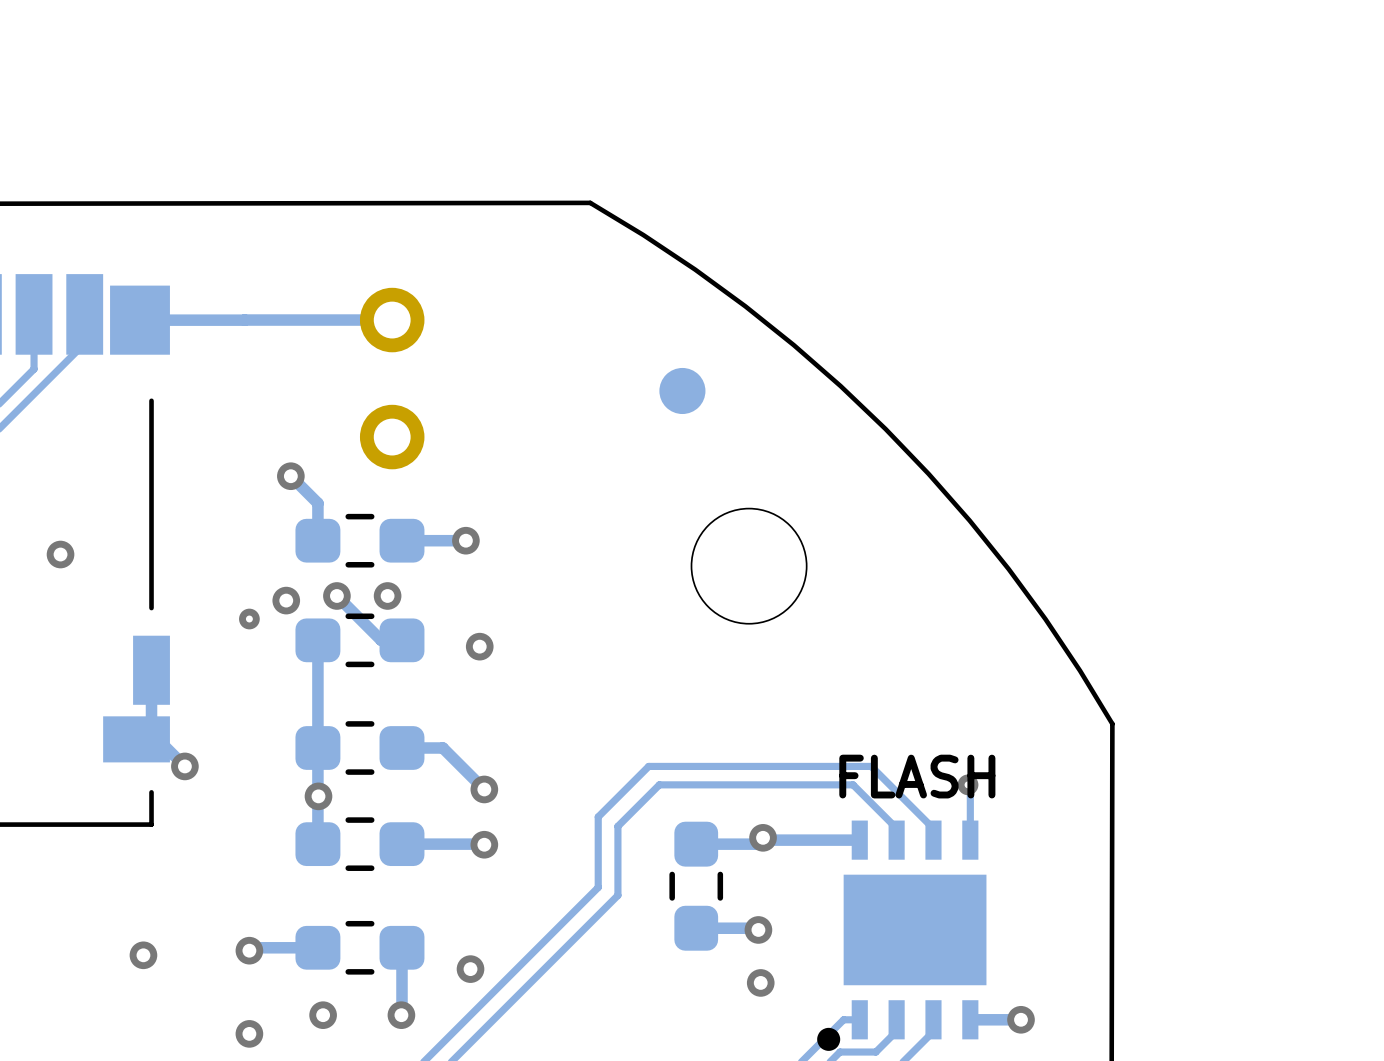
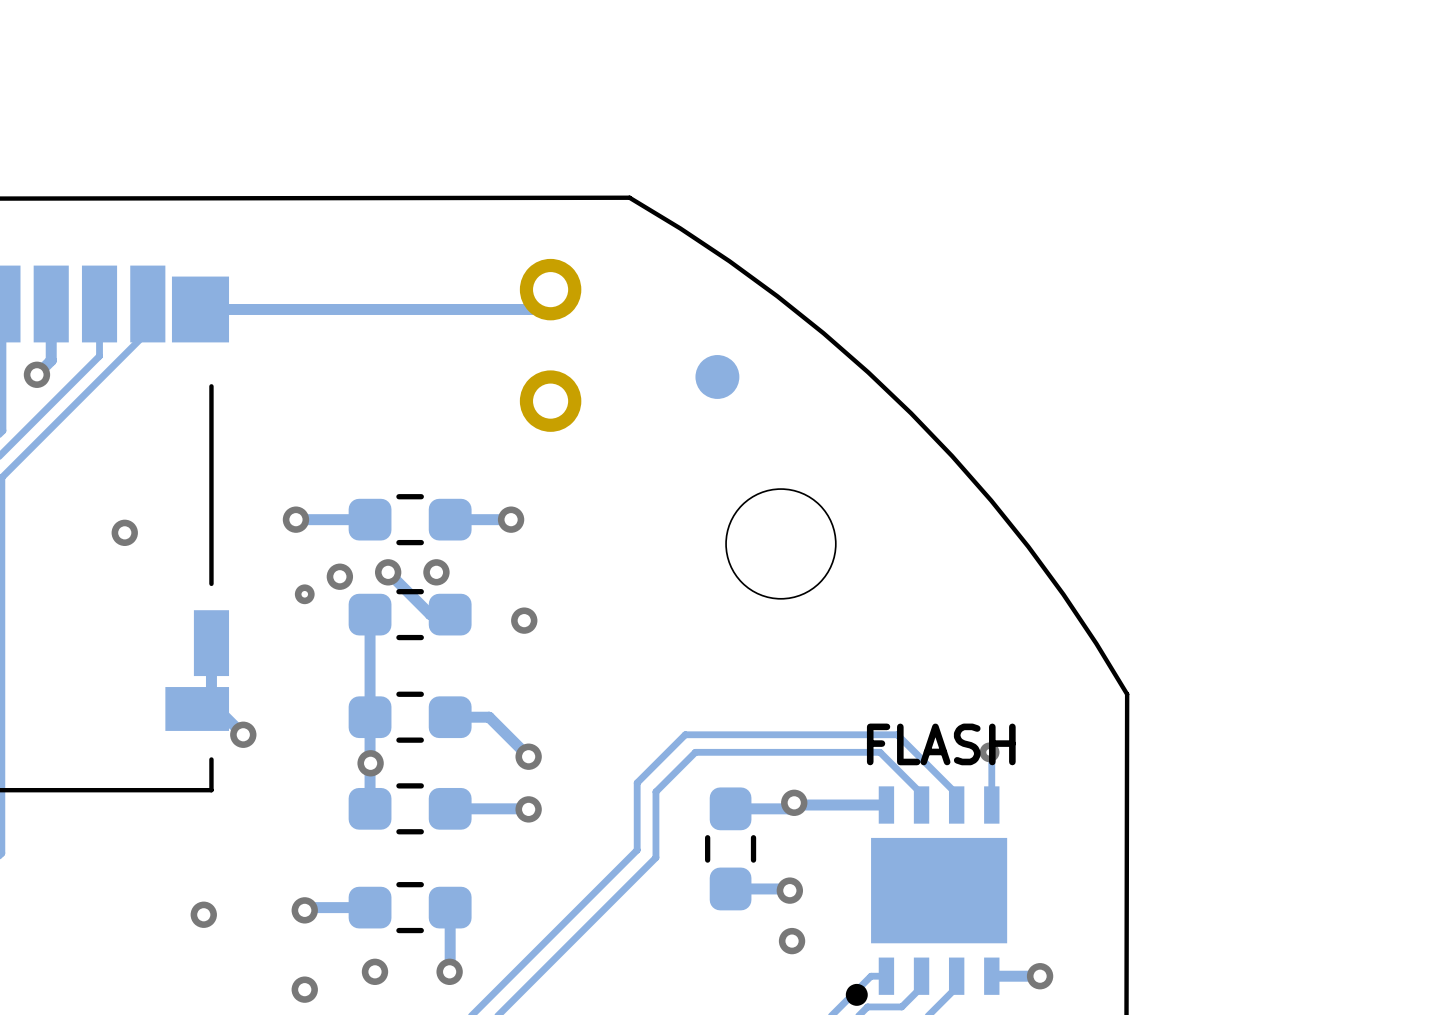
track: (392, 320) (244, 320) -> (550, 289) (530, 309) (300, 309)
part position: (392, 378) -> (550, 345)
track: (290, 476) (317, 503) (317, 540) -> (295, 519) (370, 519)
via position: (290, 476) -> (295, 519)
via: (470, 969) -> none

